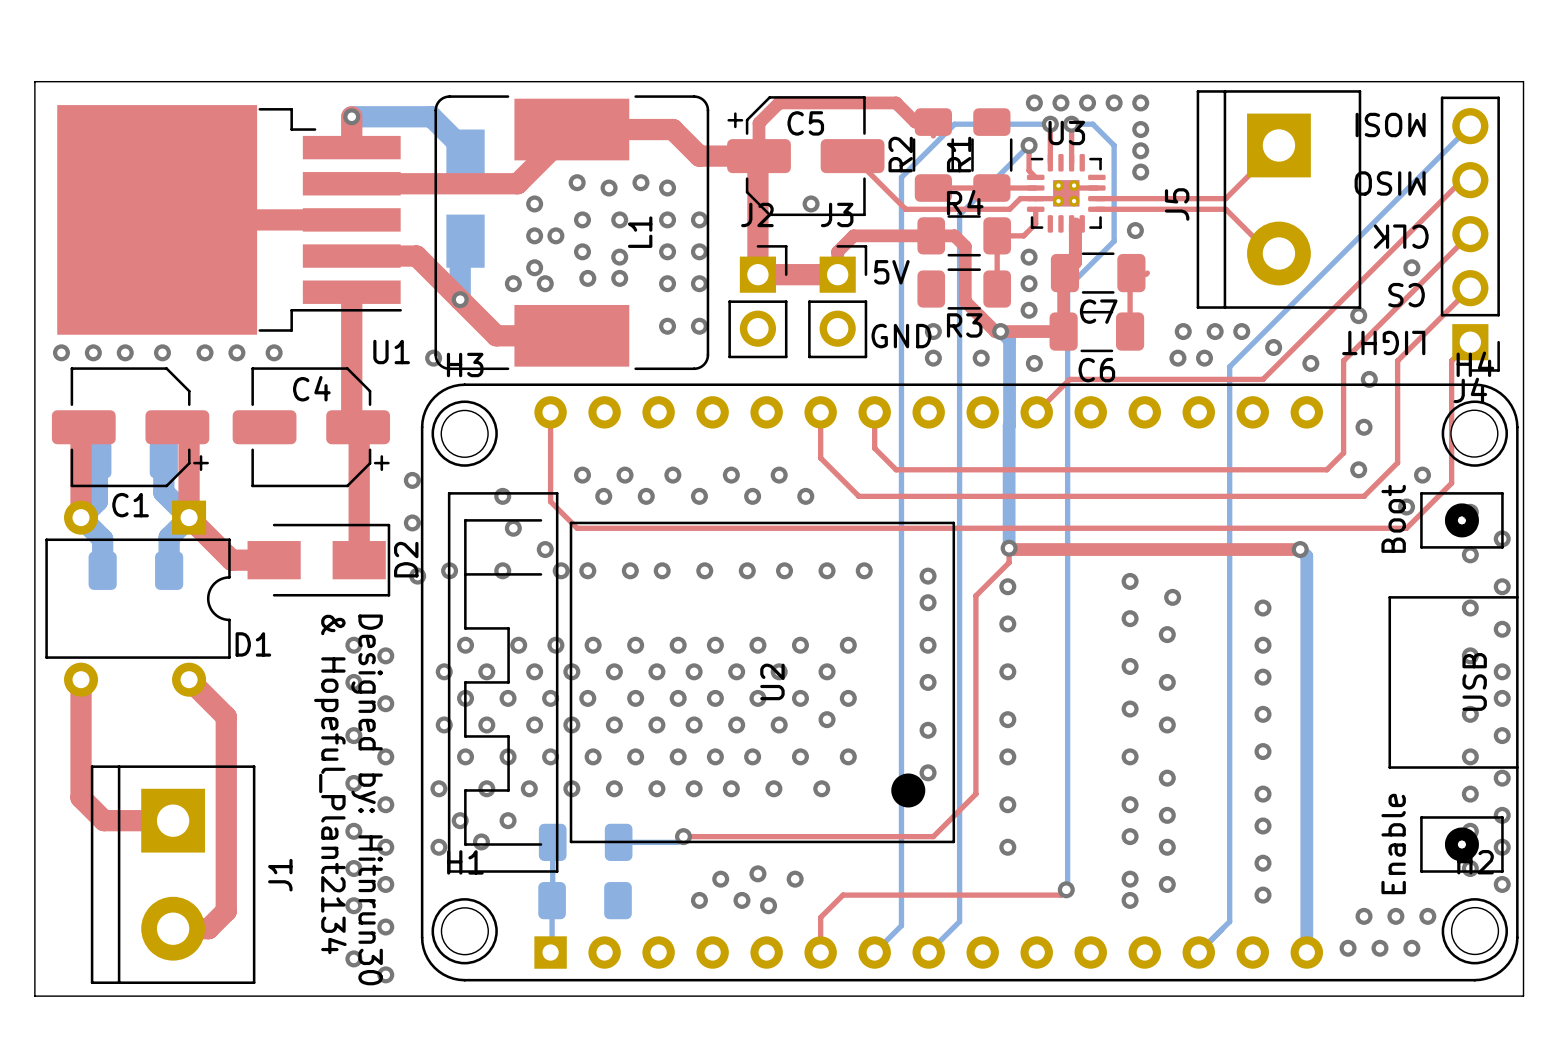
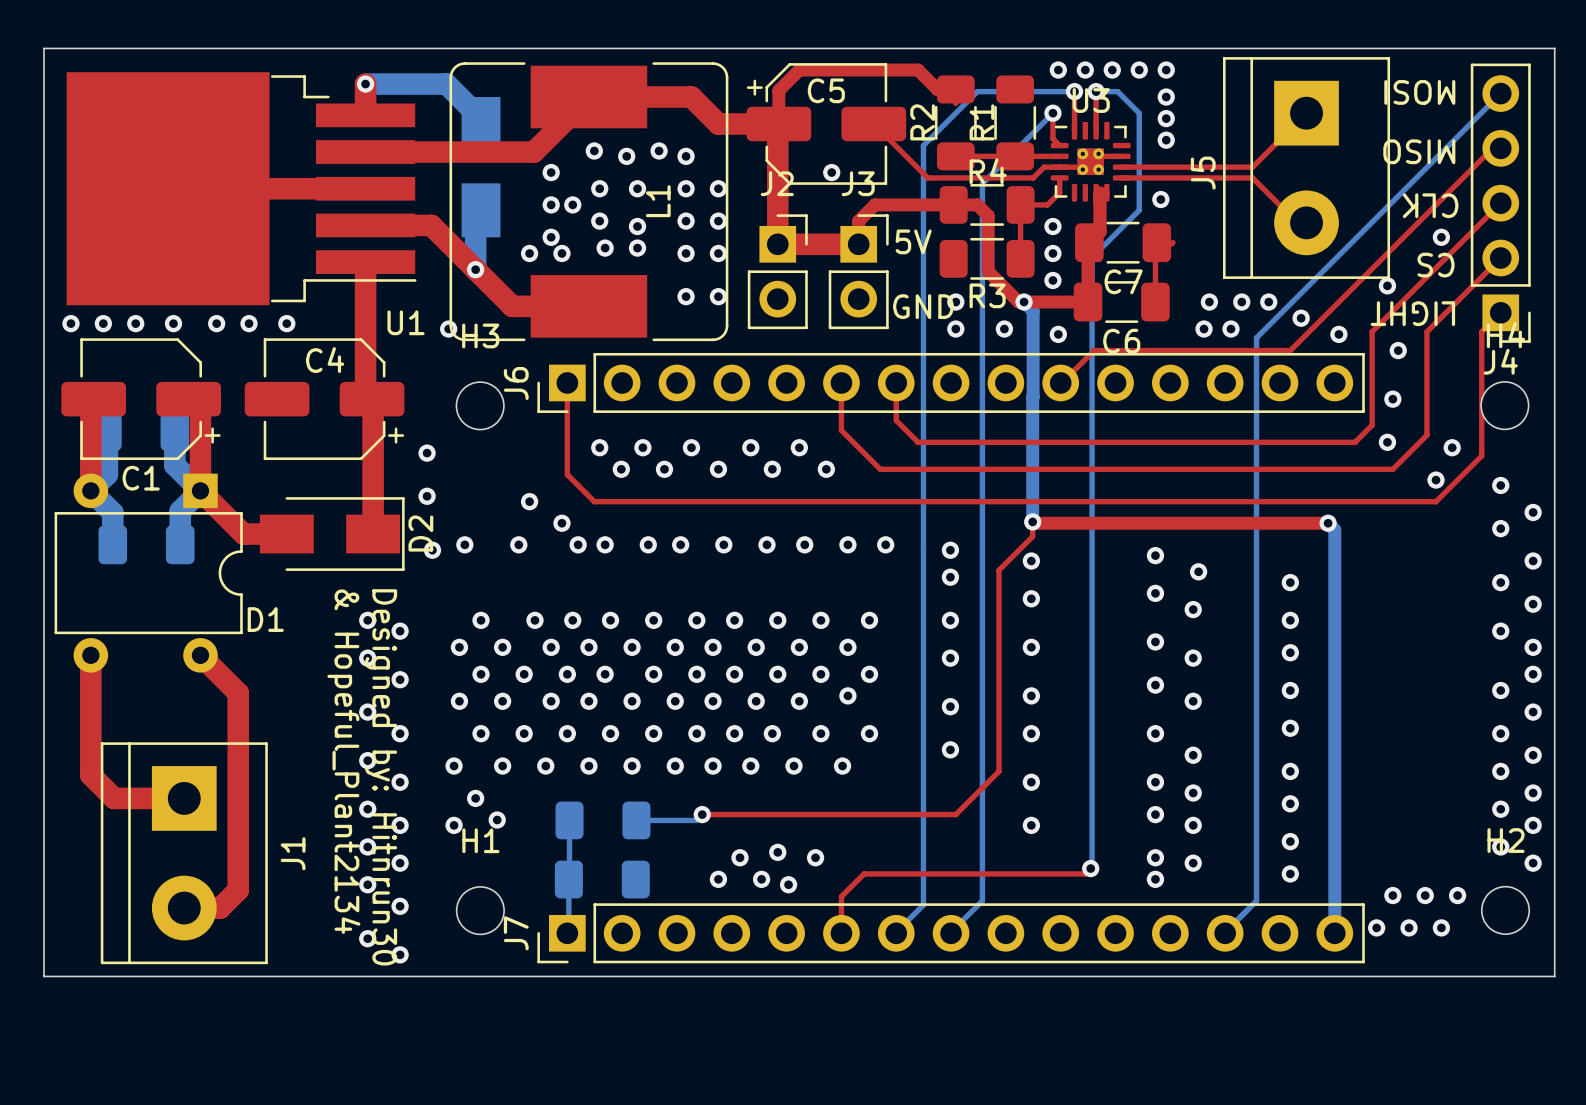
J6: none -> (951, 382)
via: (502, 496) -> none
U2: (969, 682) -> none
via: (508, 820) -> none
J7: none -> (951, 933)

